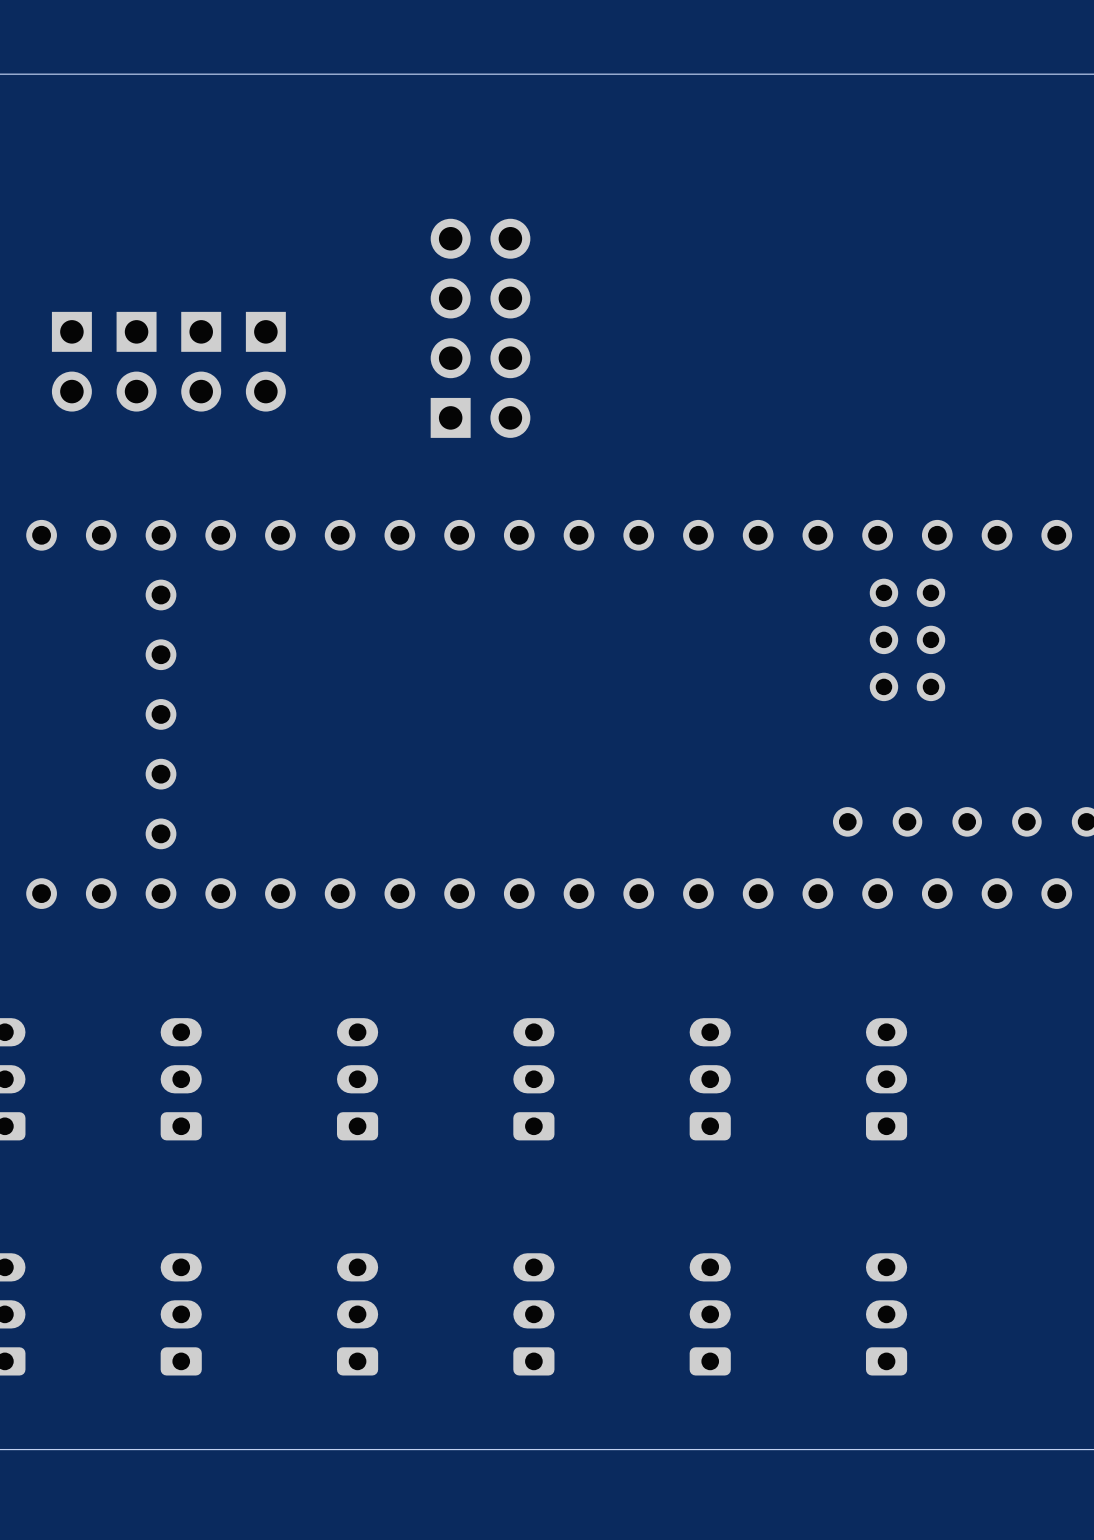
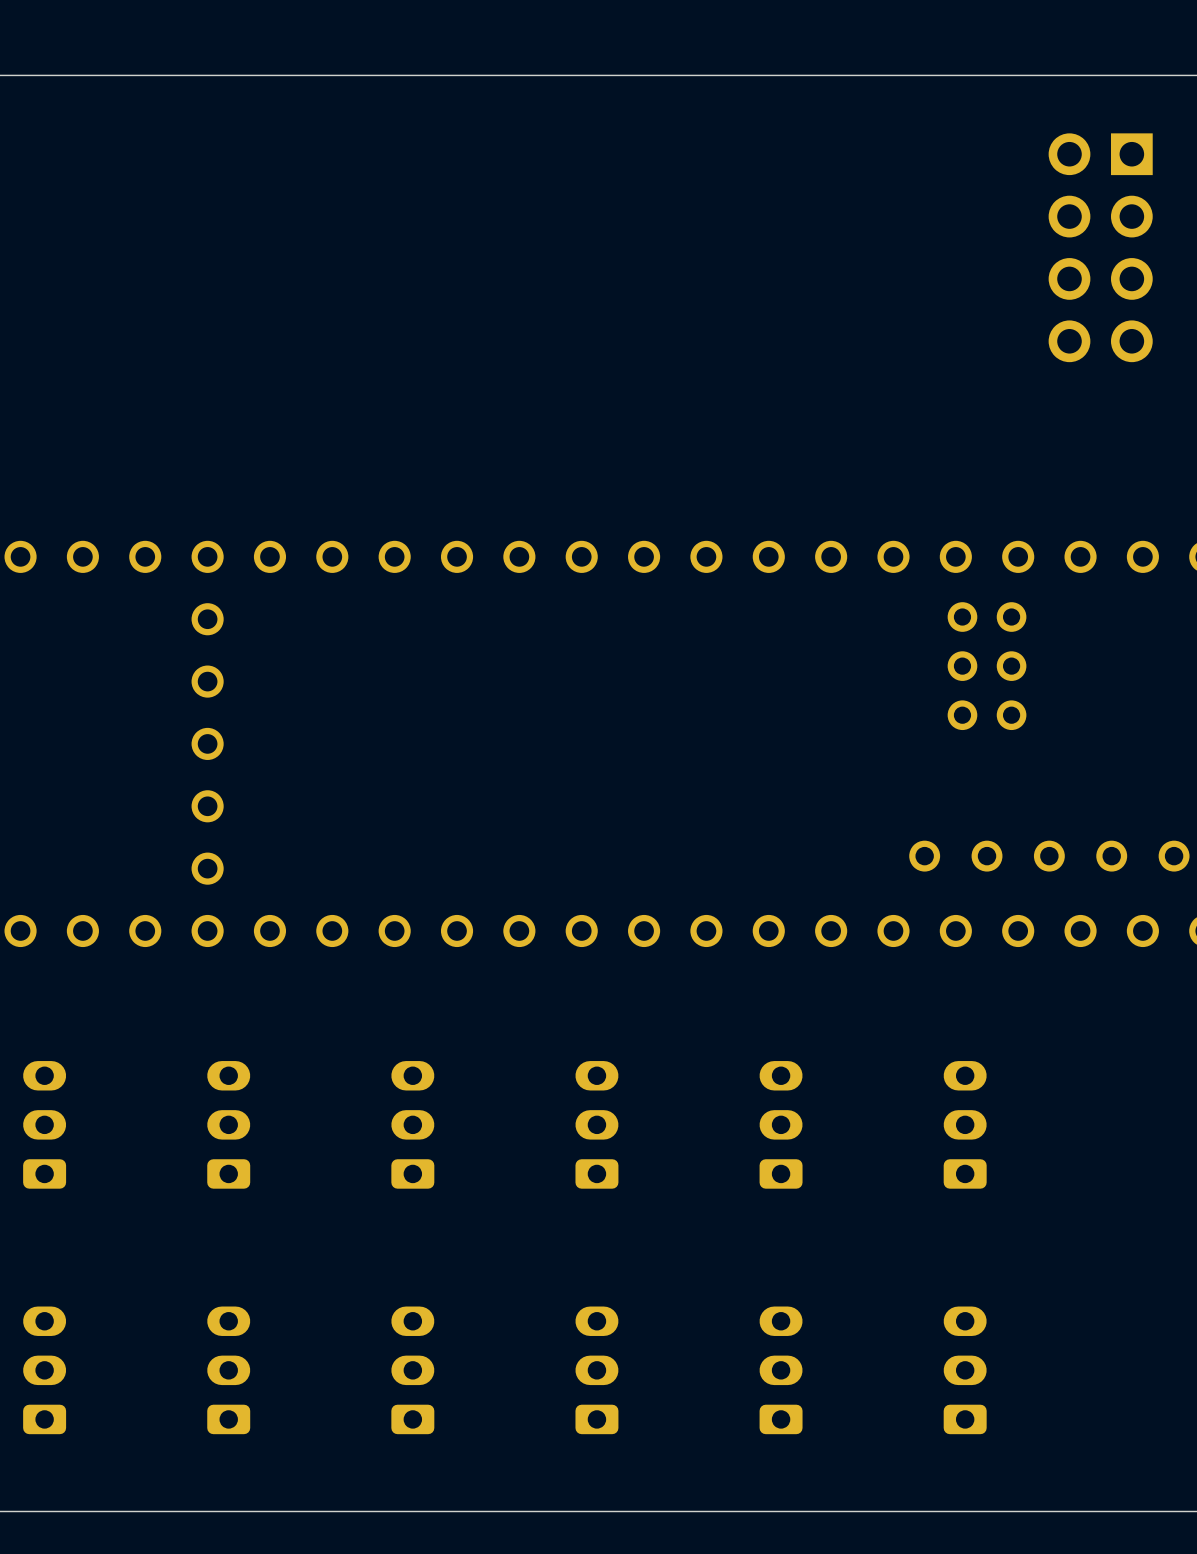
part rotation: 0° (480, 328) -> 180° (1100, 247)
part position: (480, 328) -> (1100, 247)
part: (71, 361) -> none
part: (136, 361) -> none
part: (201, 361) -> none
part: (265, 361) -> none

